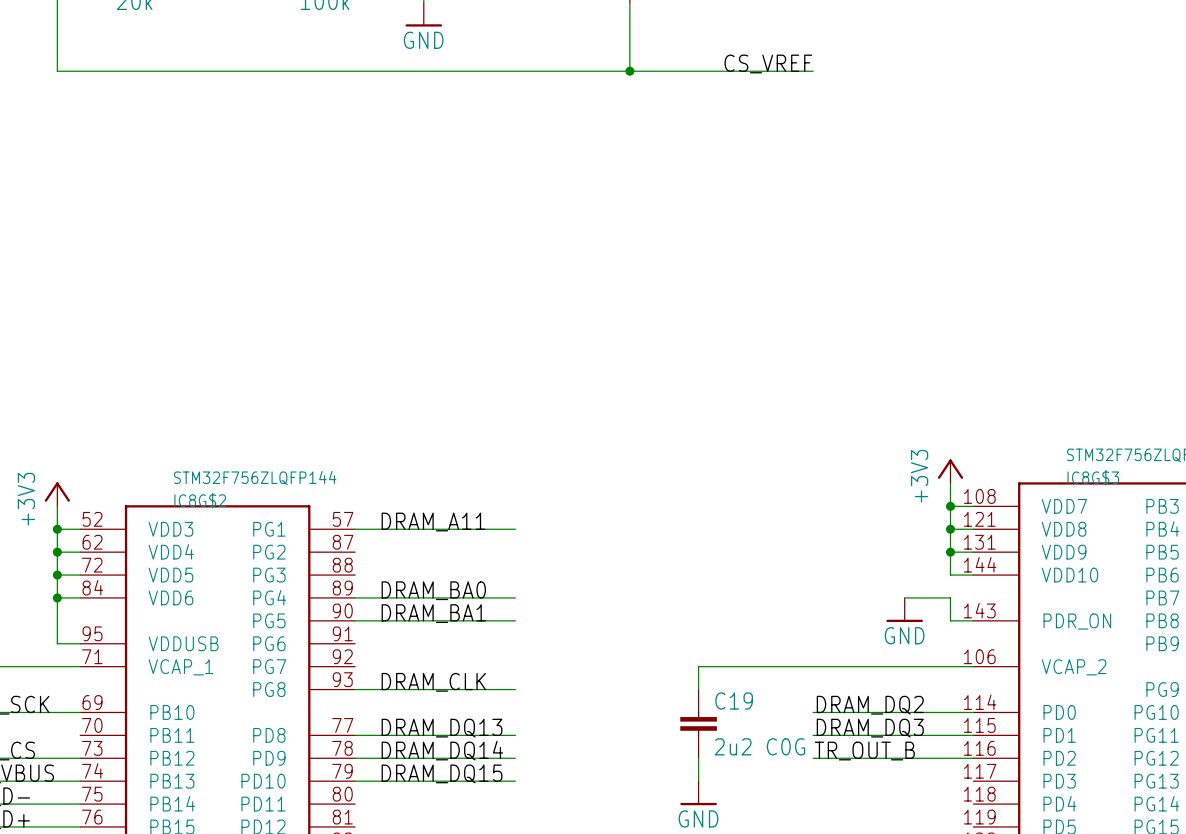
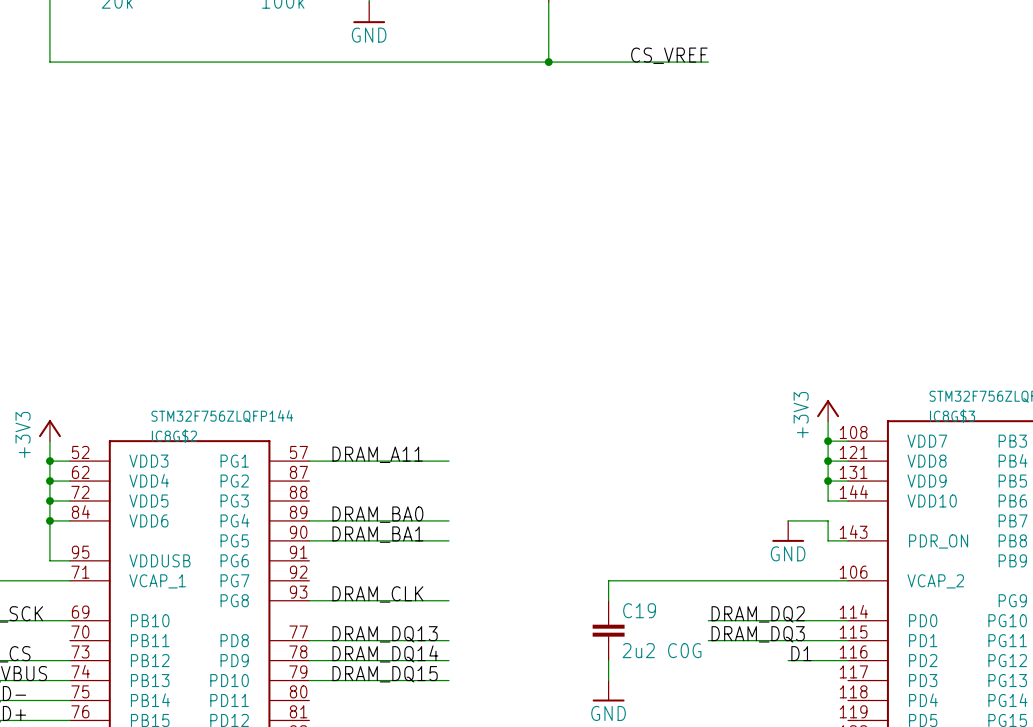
label: none -> D1 (801, 653)
label: TR_OUT_B (864, 751) -> none
wire: (813, 758) (904, 758) -> none

